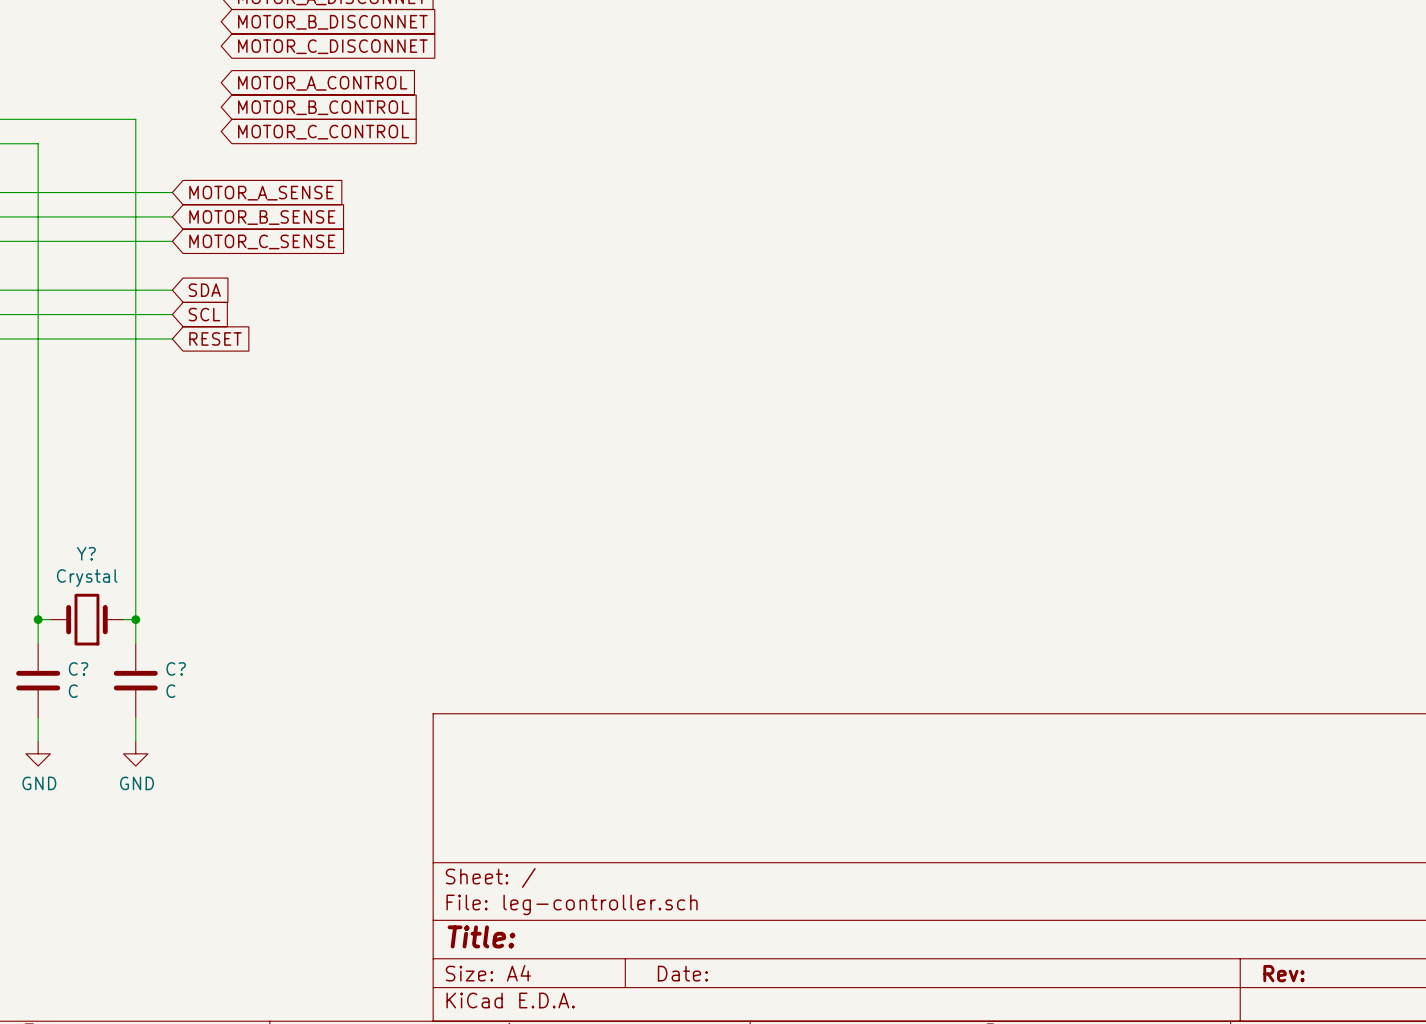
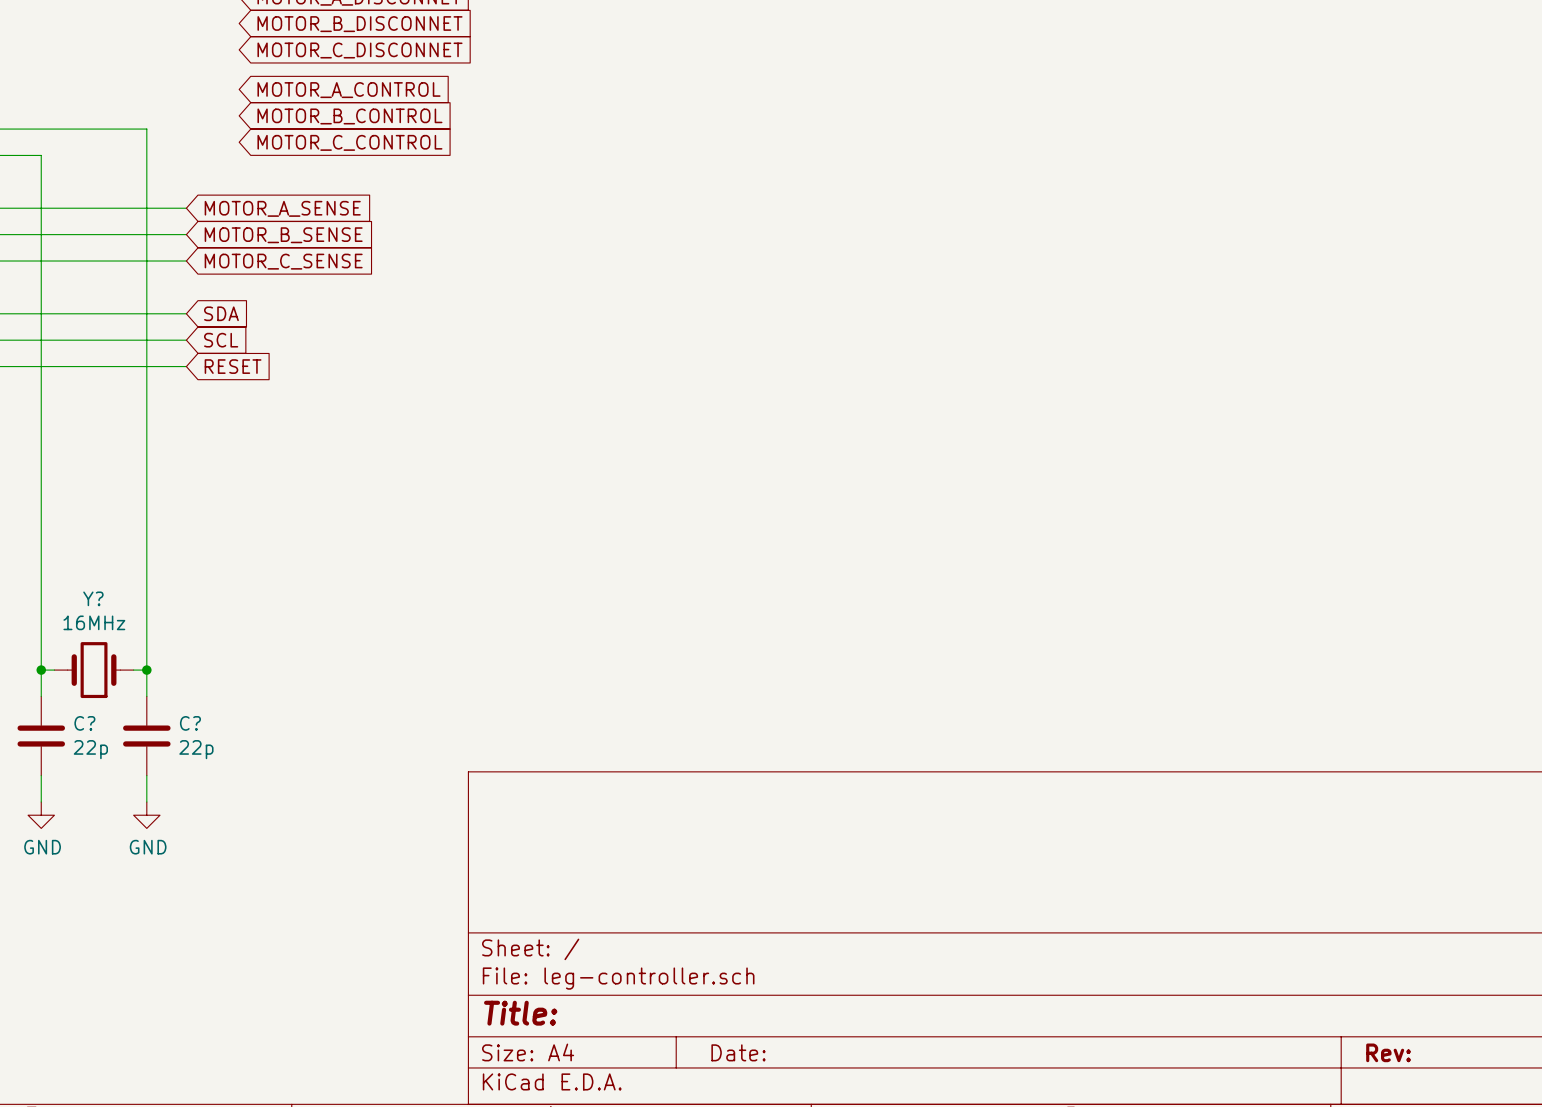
Y? value: Crystal (87, 578) -> 16MHz (94, 622)
C? value: C (73, 691) -> 22p (90, 749)
C? value: C (170, 691) -> 22p (196, 749)

